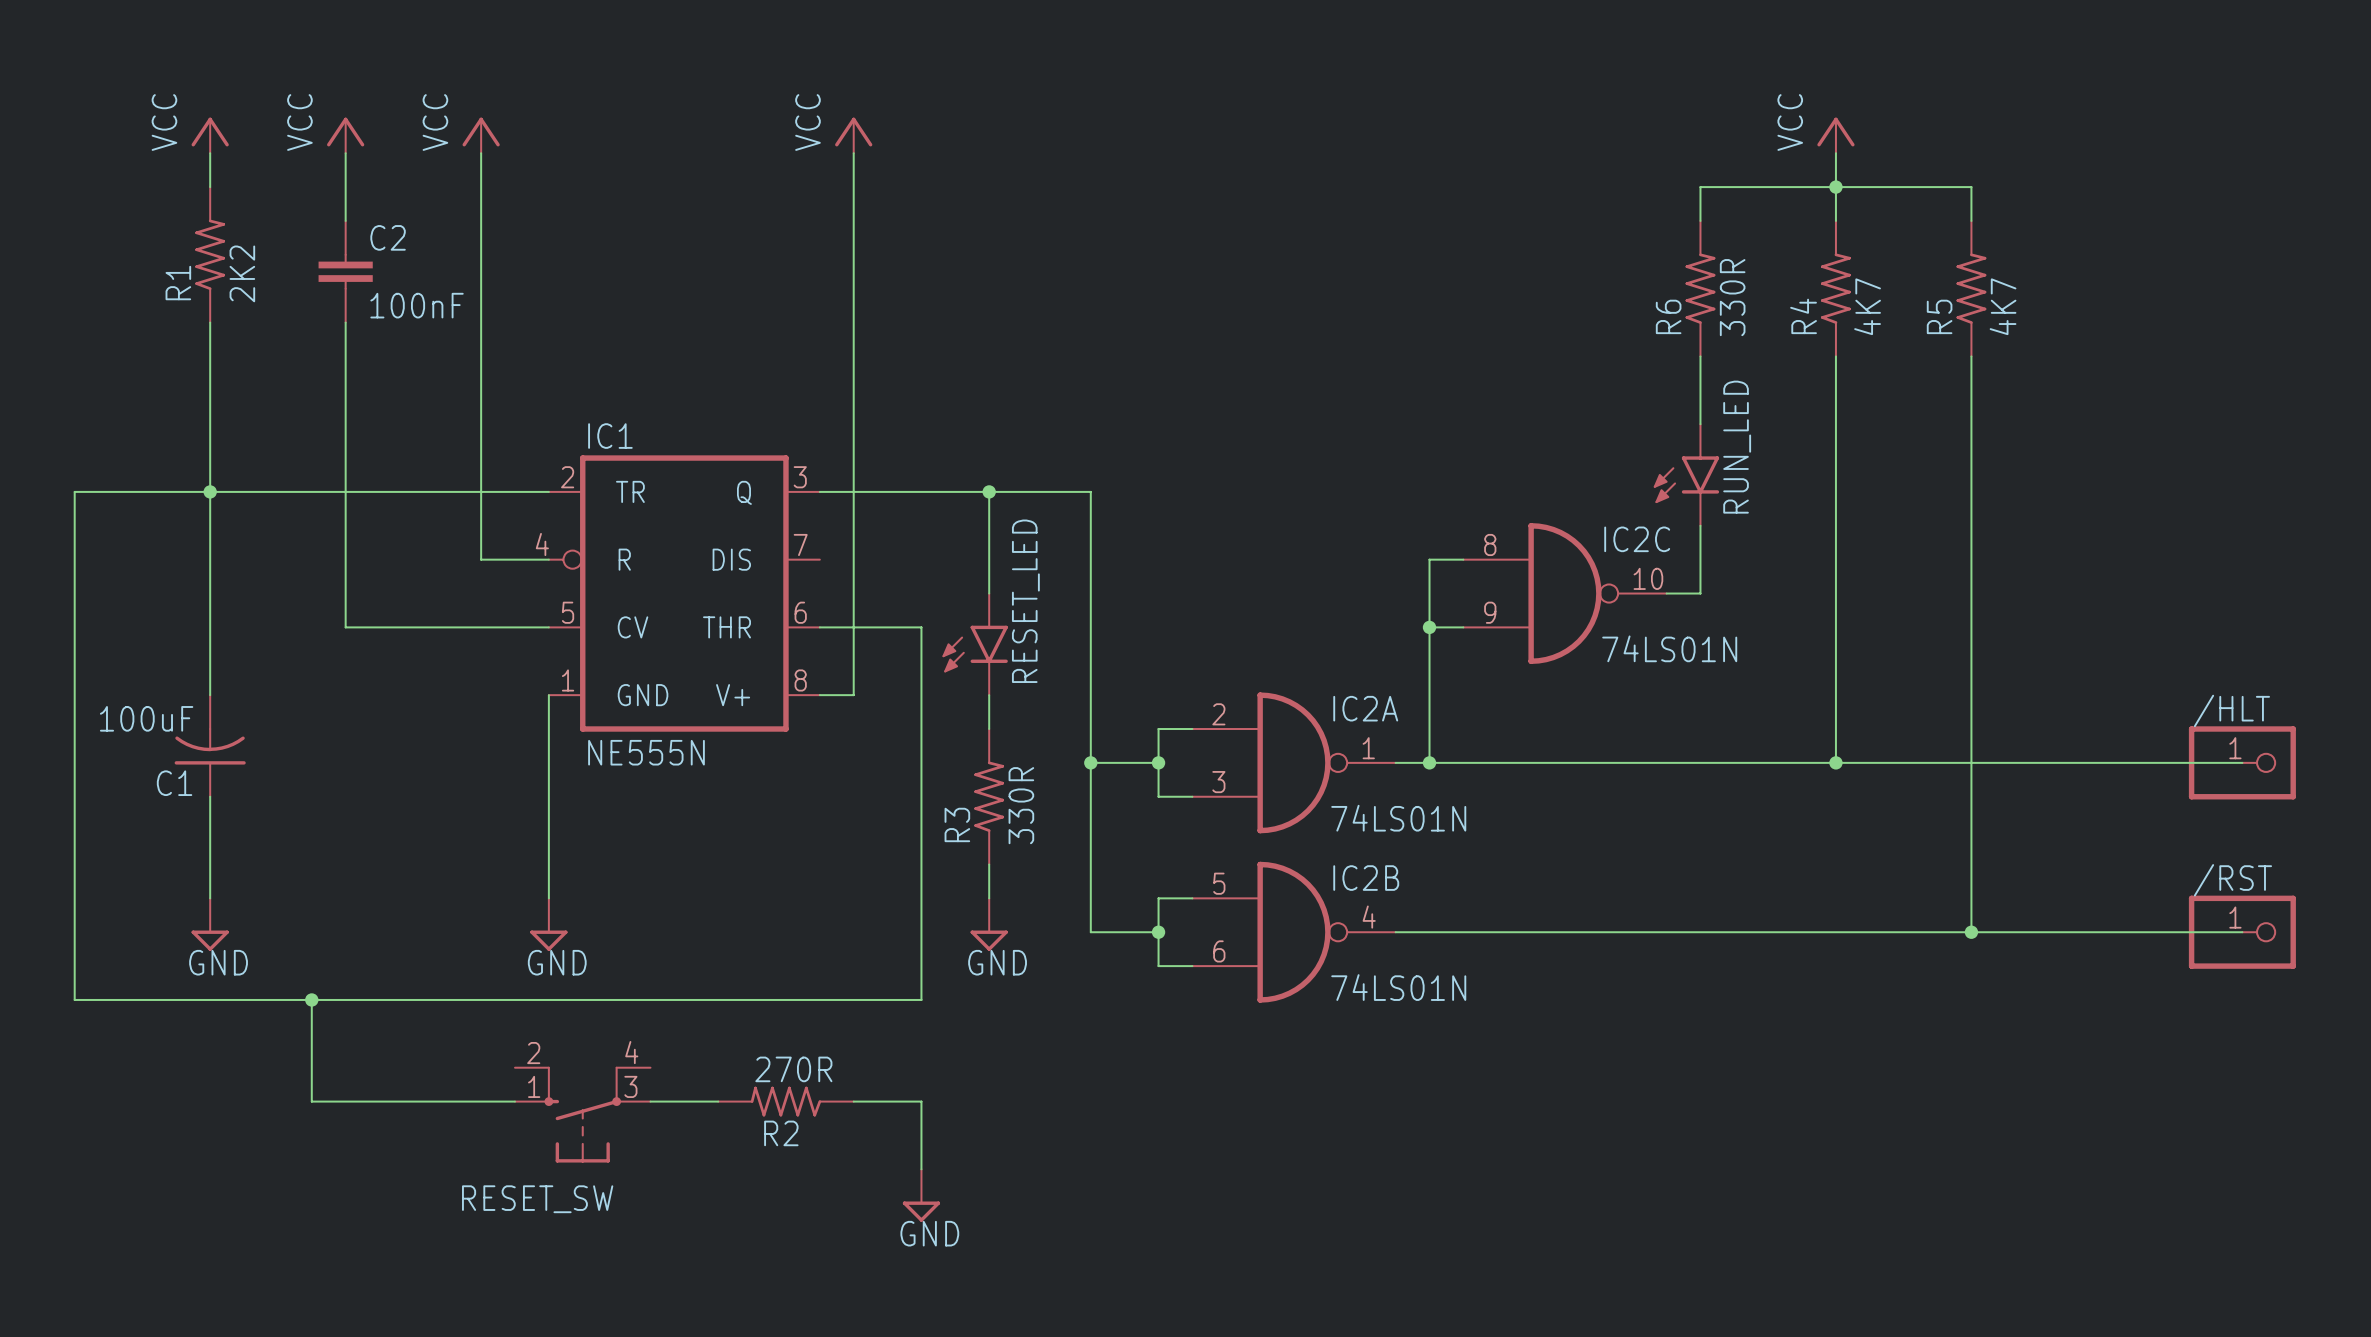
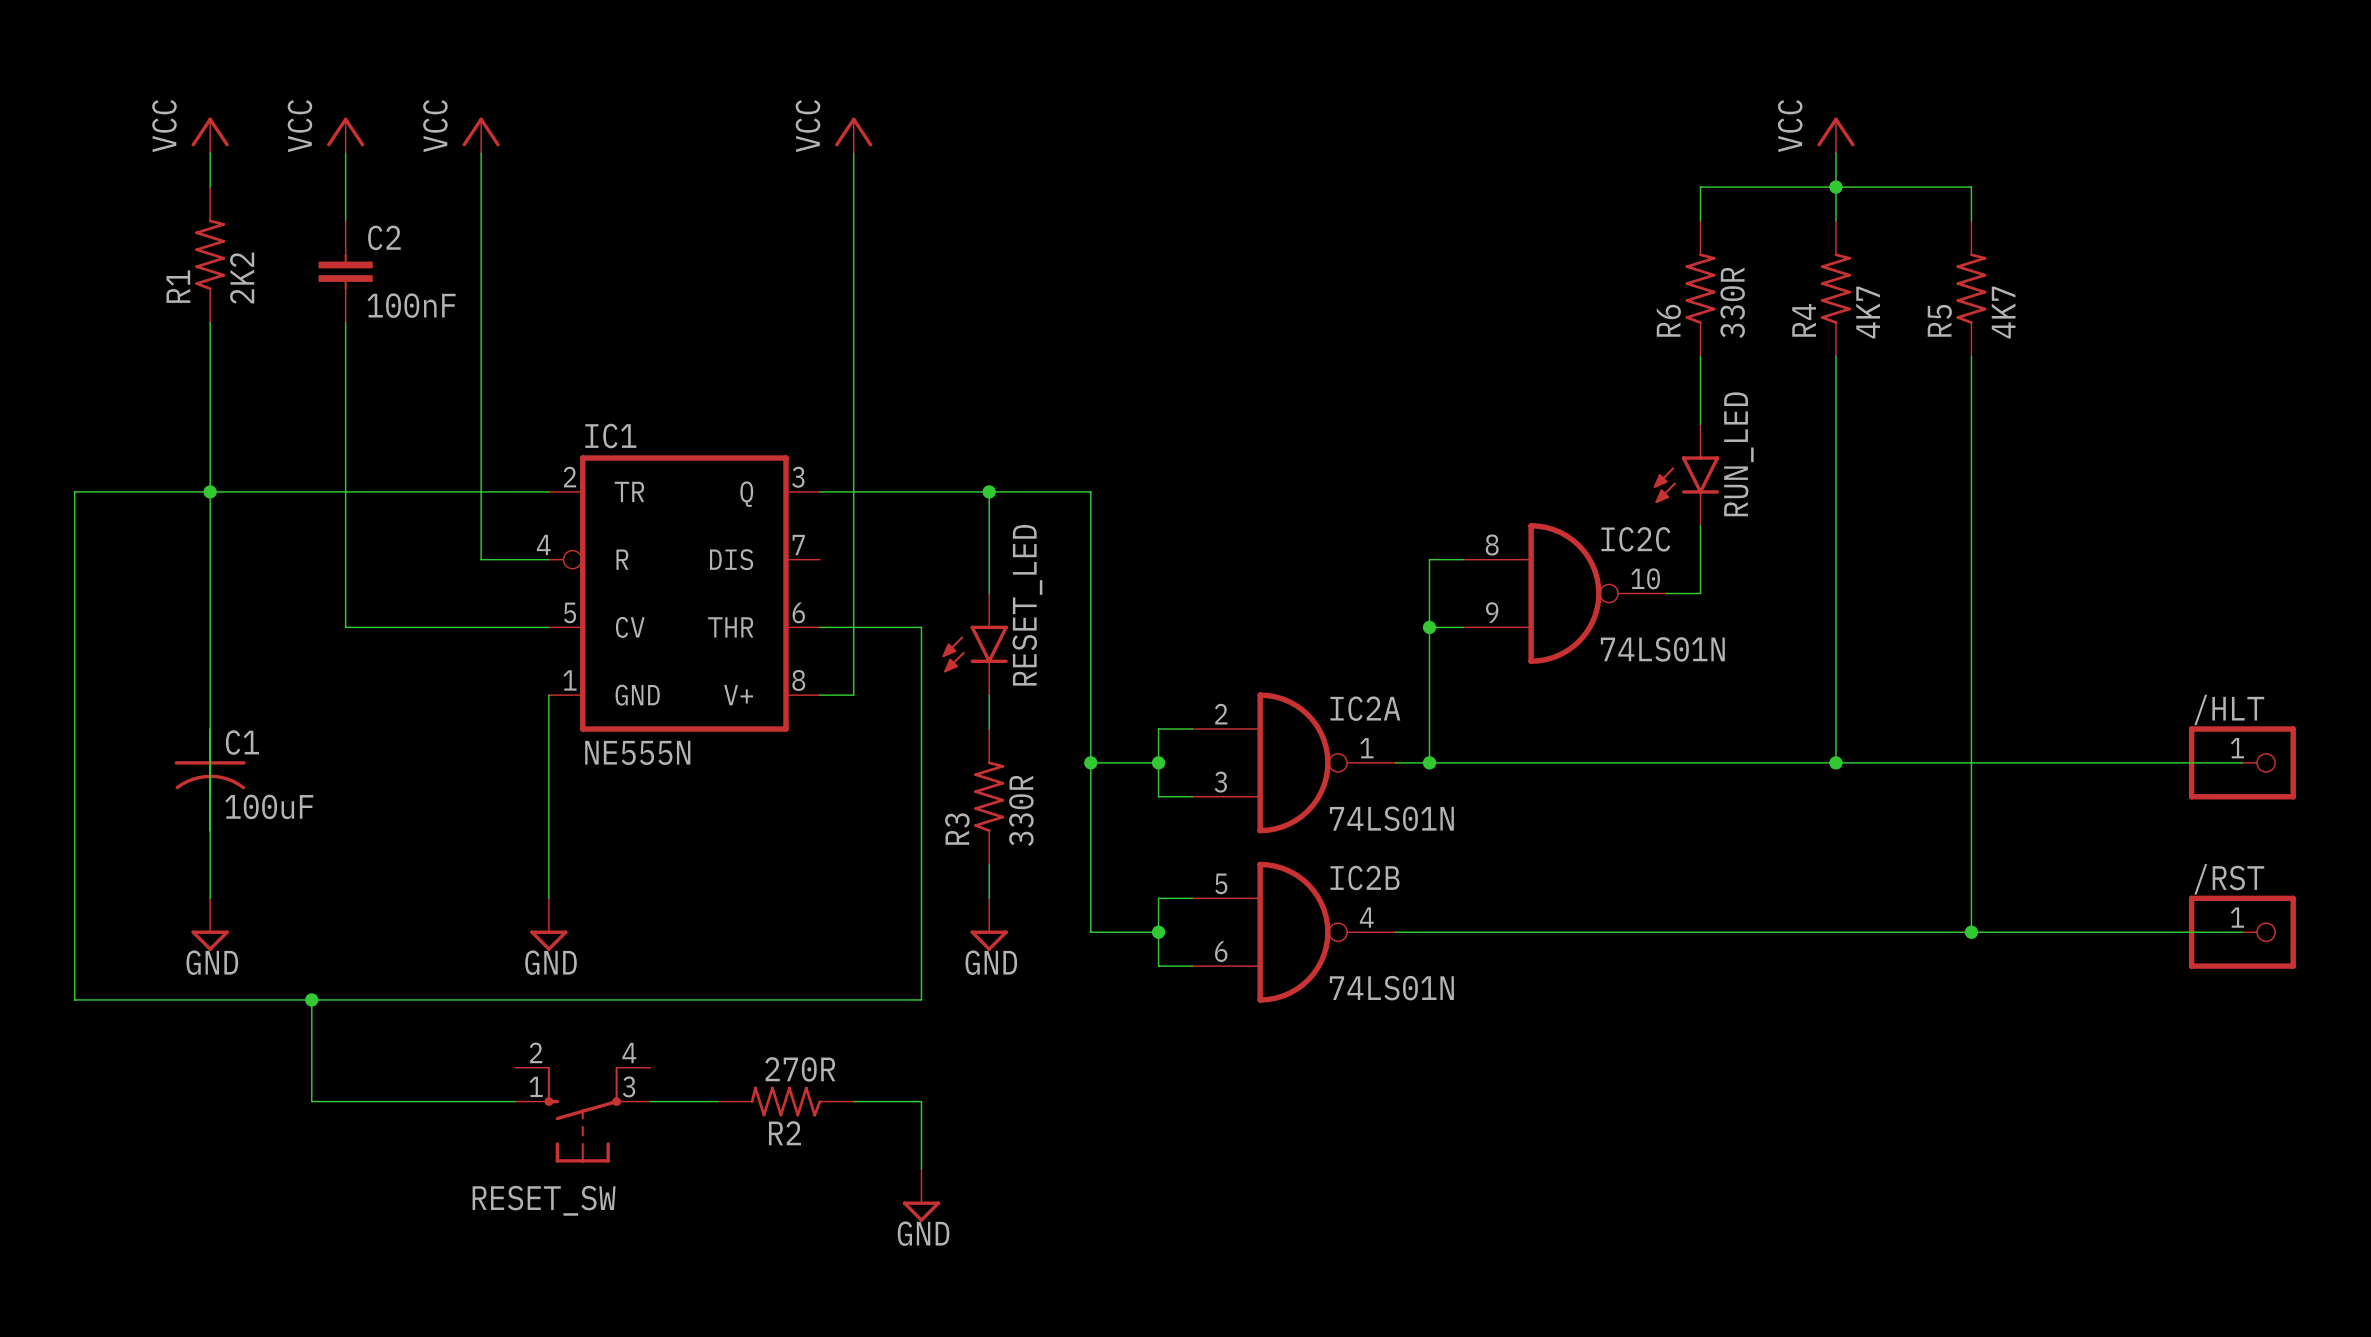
C1 rotation: 0° (210, 746) -> 180° (210, 779)

